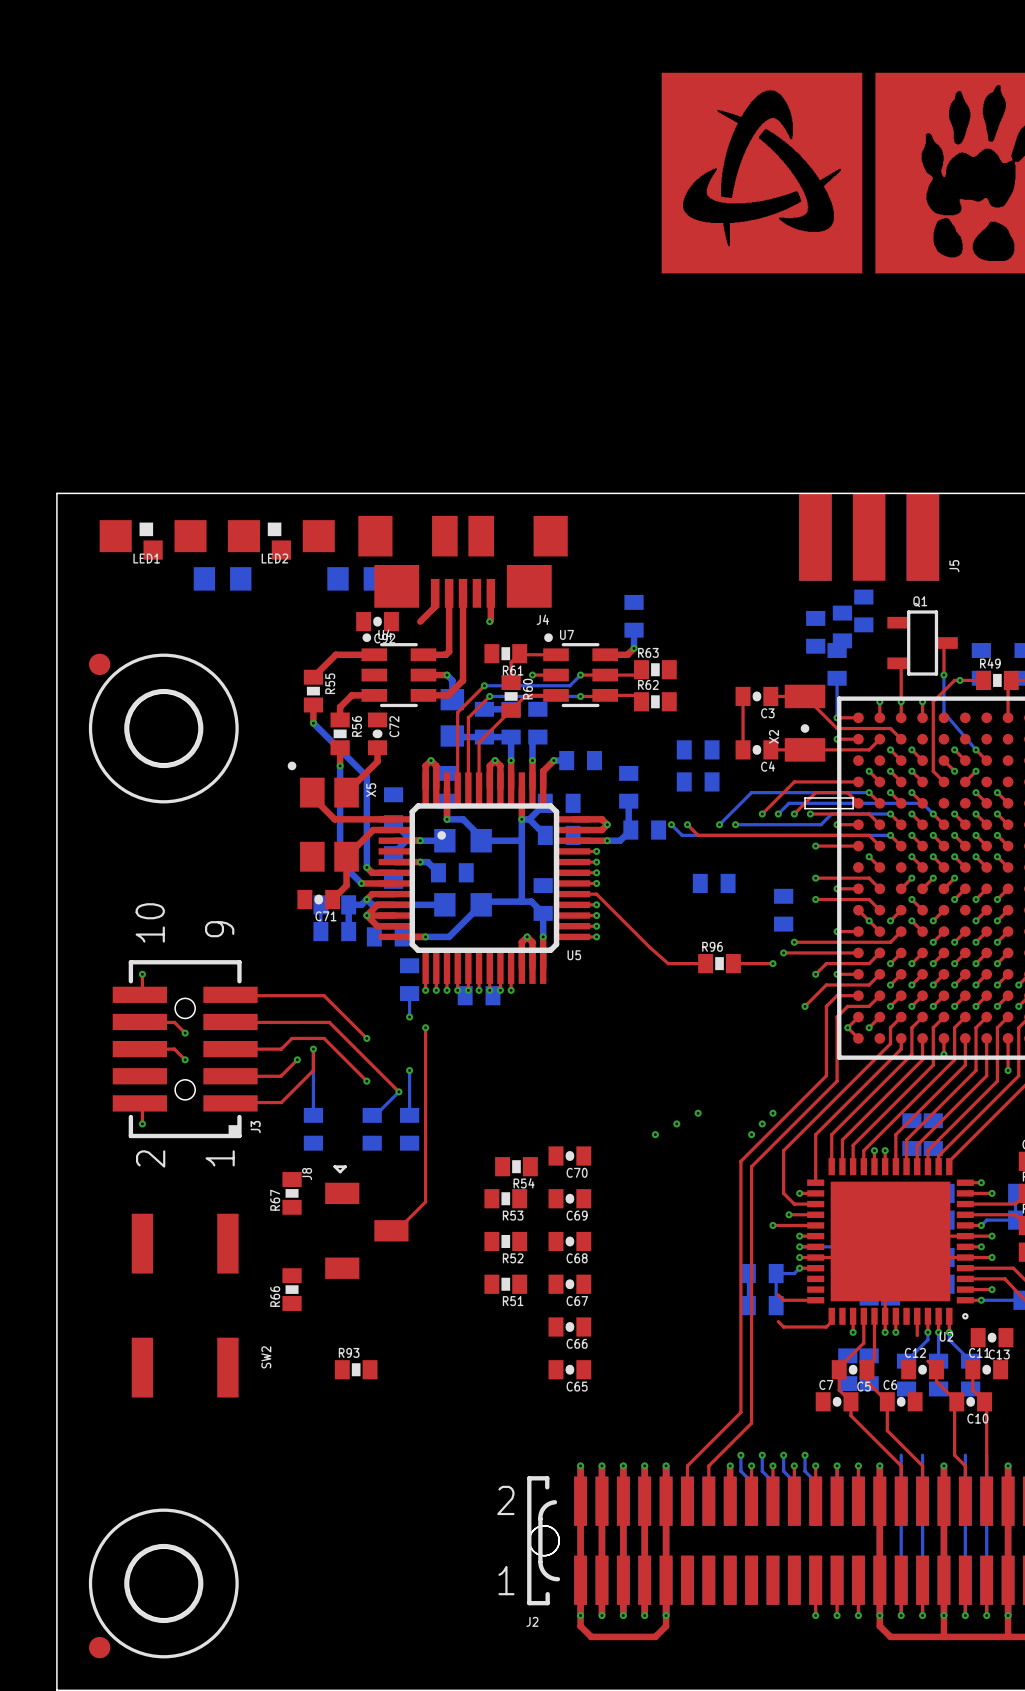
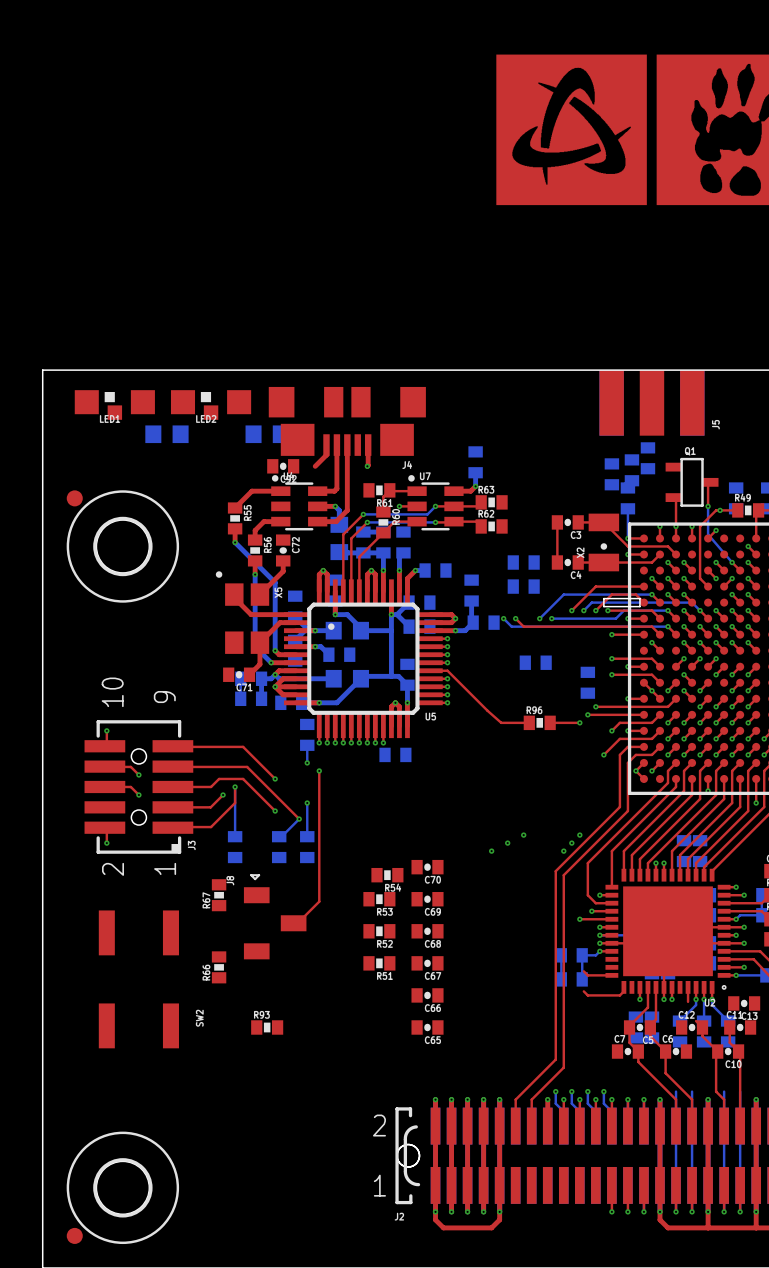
top track: none -> (716, 530) (708, 538)
via: none -> (716, 530)
top track: none -> (748, 546) (756, 554)
via: none -> (748, 546)
top track: none -> (748, 562) (756, 570)
via: none -> (748, 562)
top track: none -> (748, 578) (756, 586)
via: none -> (748, 578)
part position: (479, 995) -> (395, 754)

